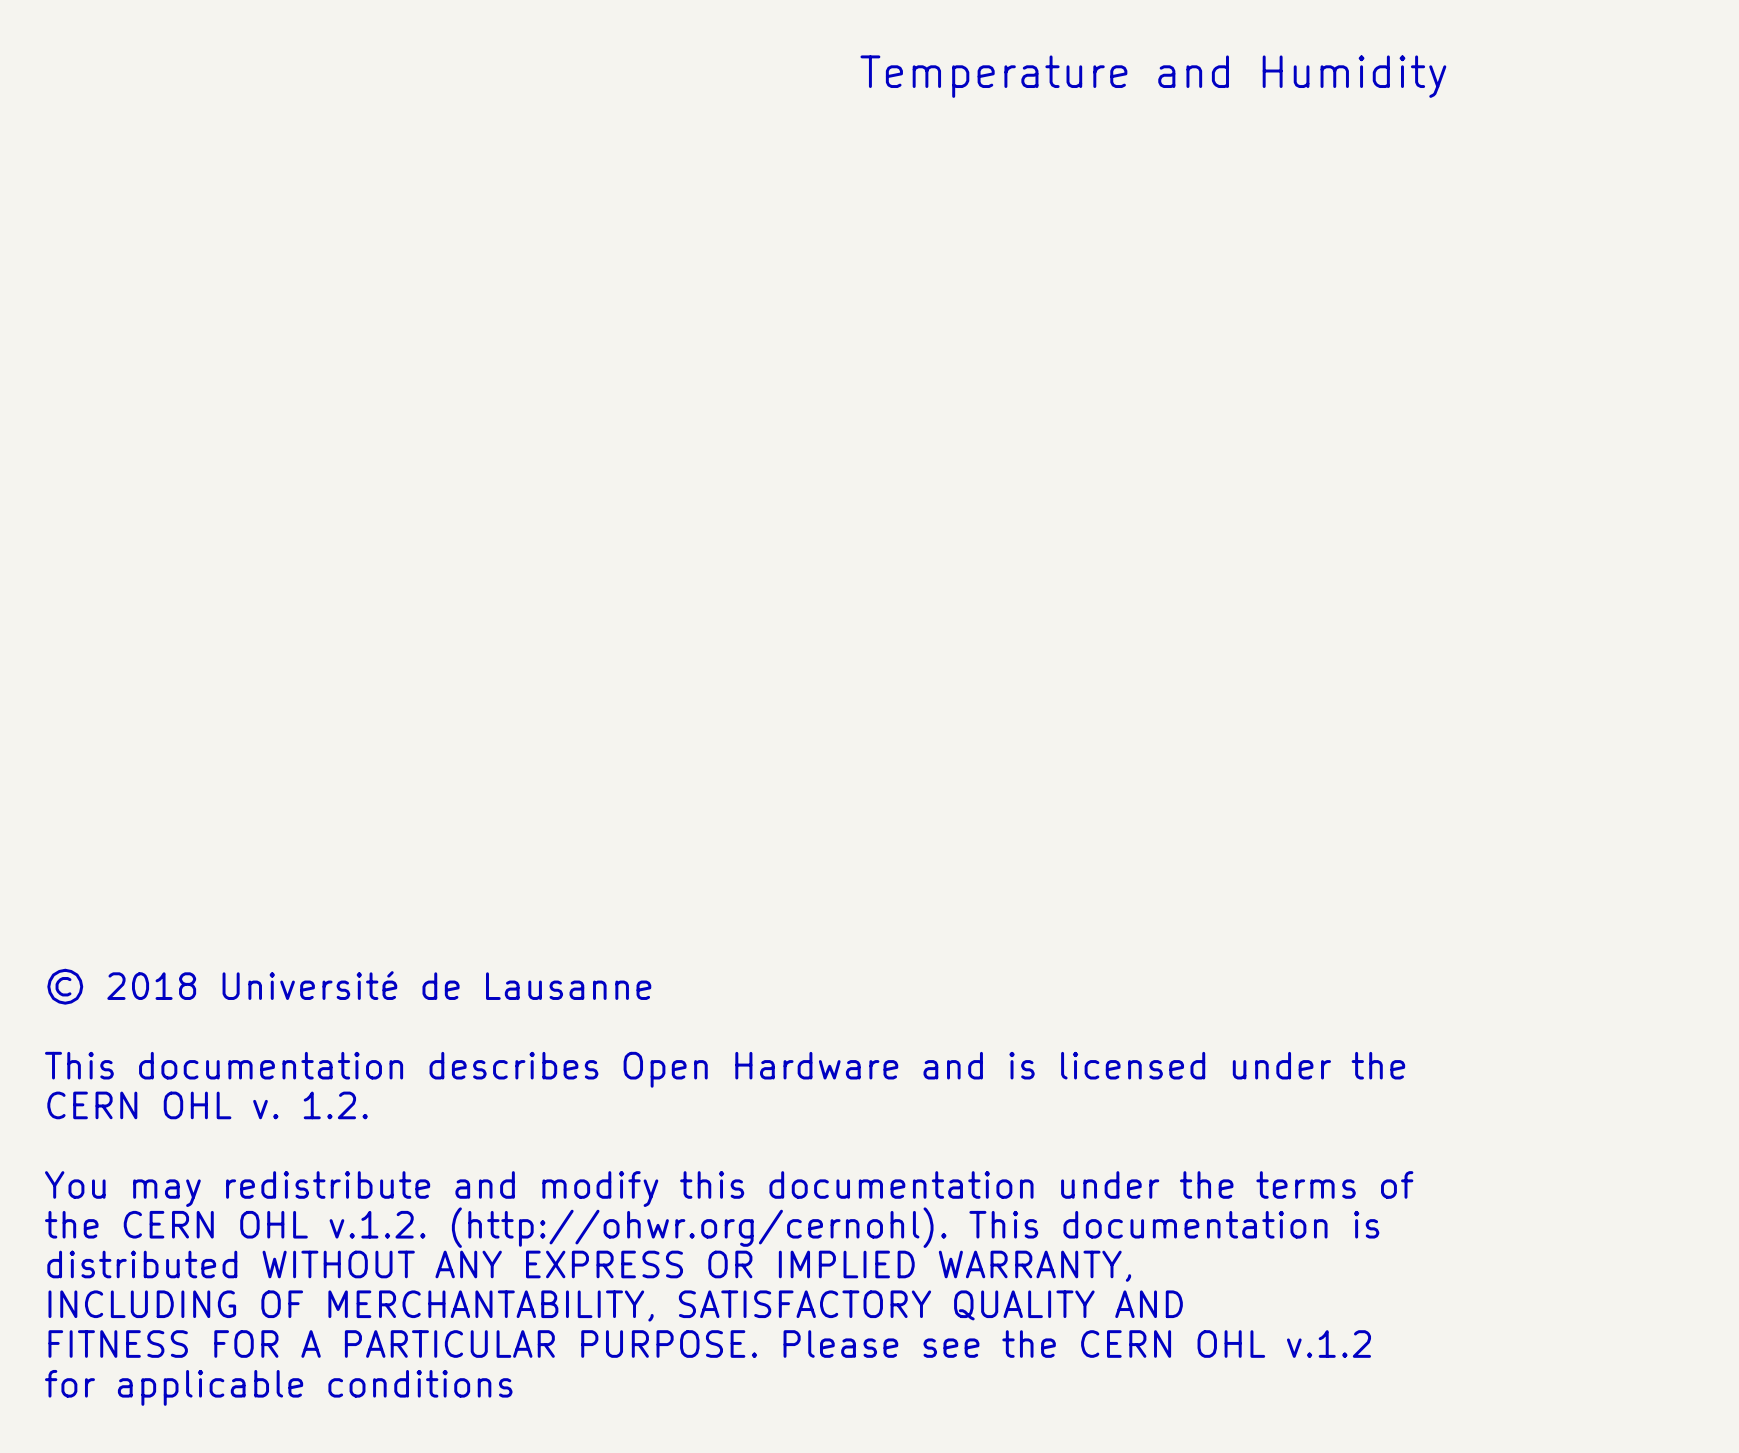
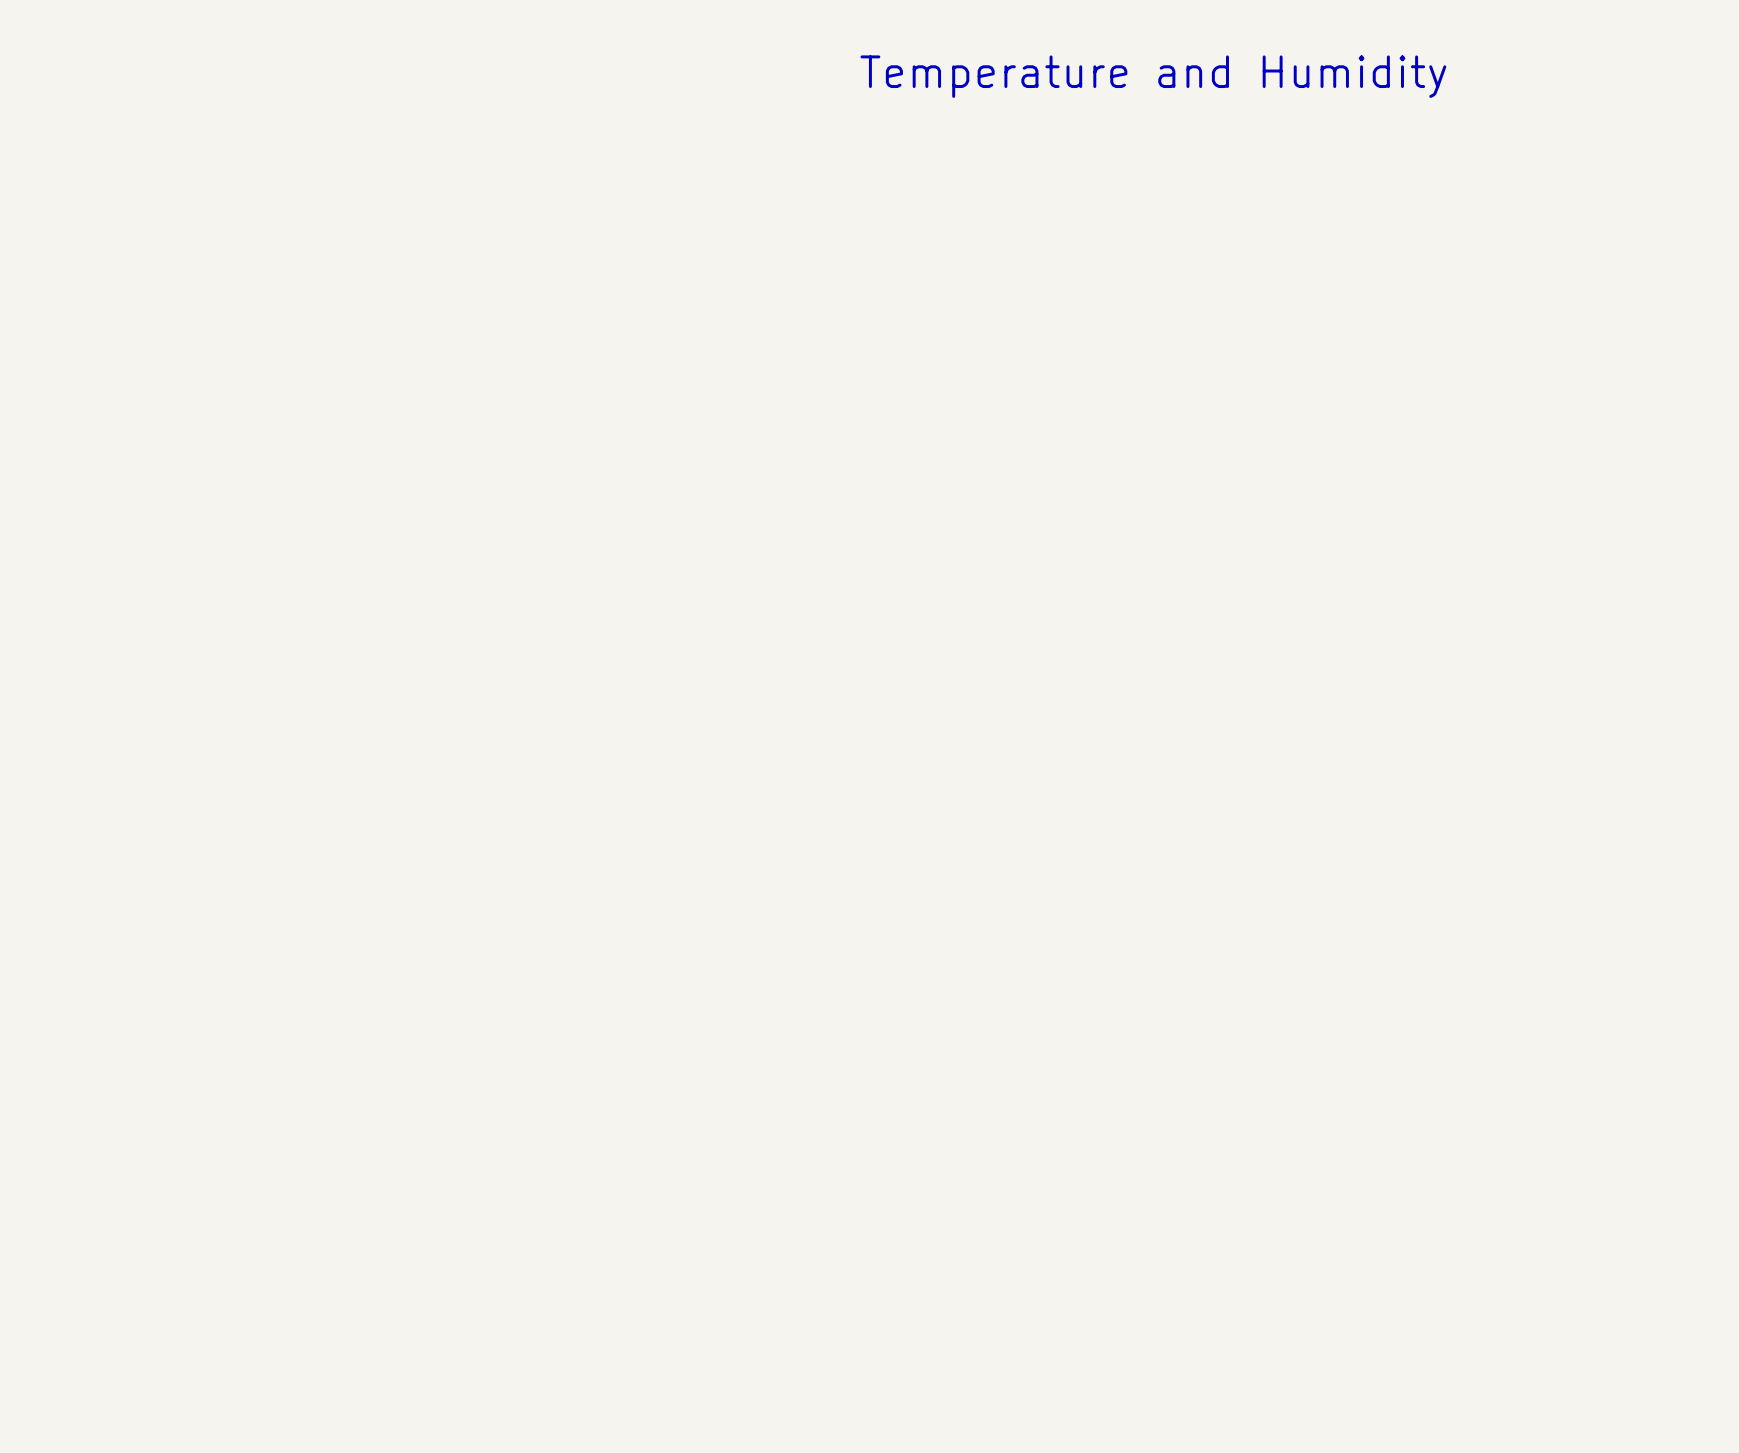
text: © 2018 Université de Lausanne (349, 986) -> none
text: This documentation describes Open Hardware and is licensed under the (725, 1069) -> none
text: CERN OHL v. 1.2. (207, 1105) -> none
text: You may redistribute and modify this documentation under the terms of (729, 1189) -> none
text: the CERN OHL v.1.2. (http://ohwr.org/cernohl). This documentation is (712, 1227) -> none
text: distributed WITHOUT ANY EXPRESS OR IMPLIED WARRANTY, (589, 1266) -> none
text: INCLUDING OF MERCHANTABILITY, SATISFACTORY QUALITY AND (615, 1306) -> none
text: FITNESS FOR A PARTICULAR PURPOSE. Please see the CERN OHL v.1.2 (709, 1344) -> none
text: for applicable conditions (278, 1387) -> none

